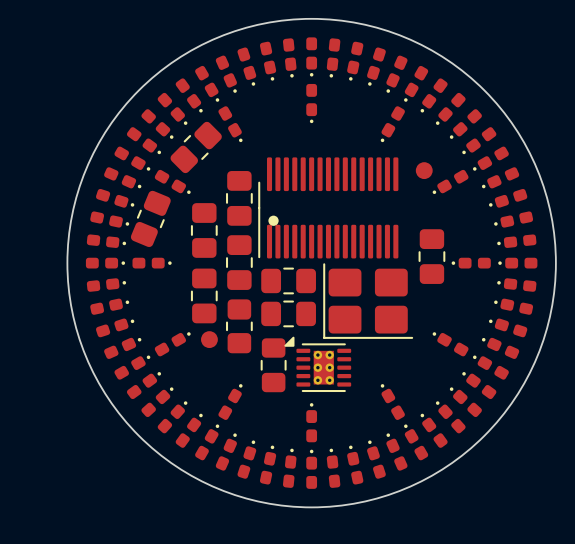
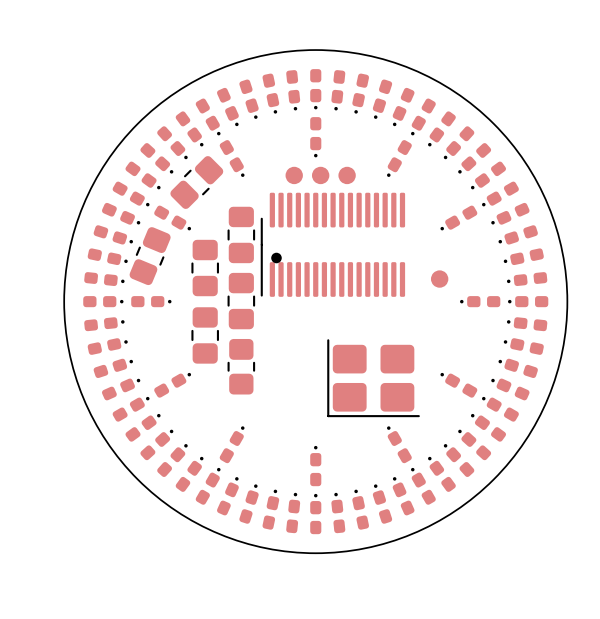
part: none -> (294, 175)
part: none -> (320, 175)
part: none -> (347, 175)
part: (424, 170) -> none
part footprint: [418, 229, 446, 284] -> [430, 270, 449, 288]
part: (288, 280) -> none
part position: (368, 301) -> (373, 378)
part: (288, 313) -> none
part: (209, 339) -> none
part: (317, 364) -> none
part: (273, 365) -> none

